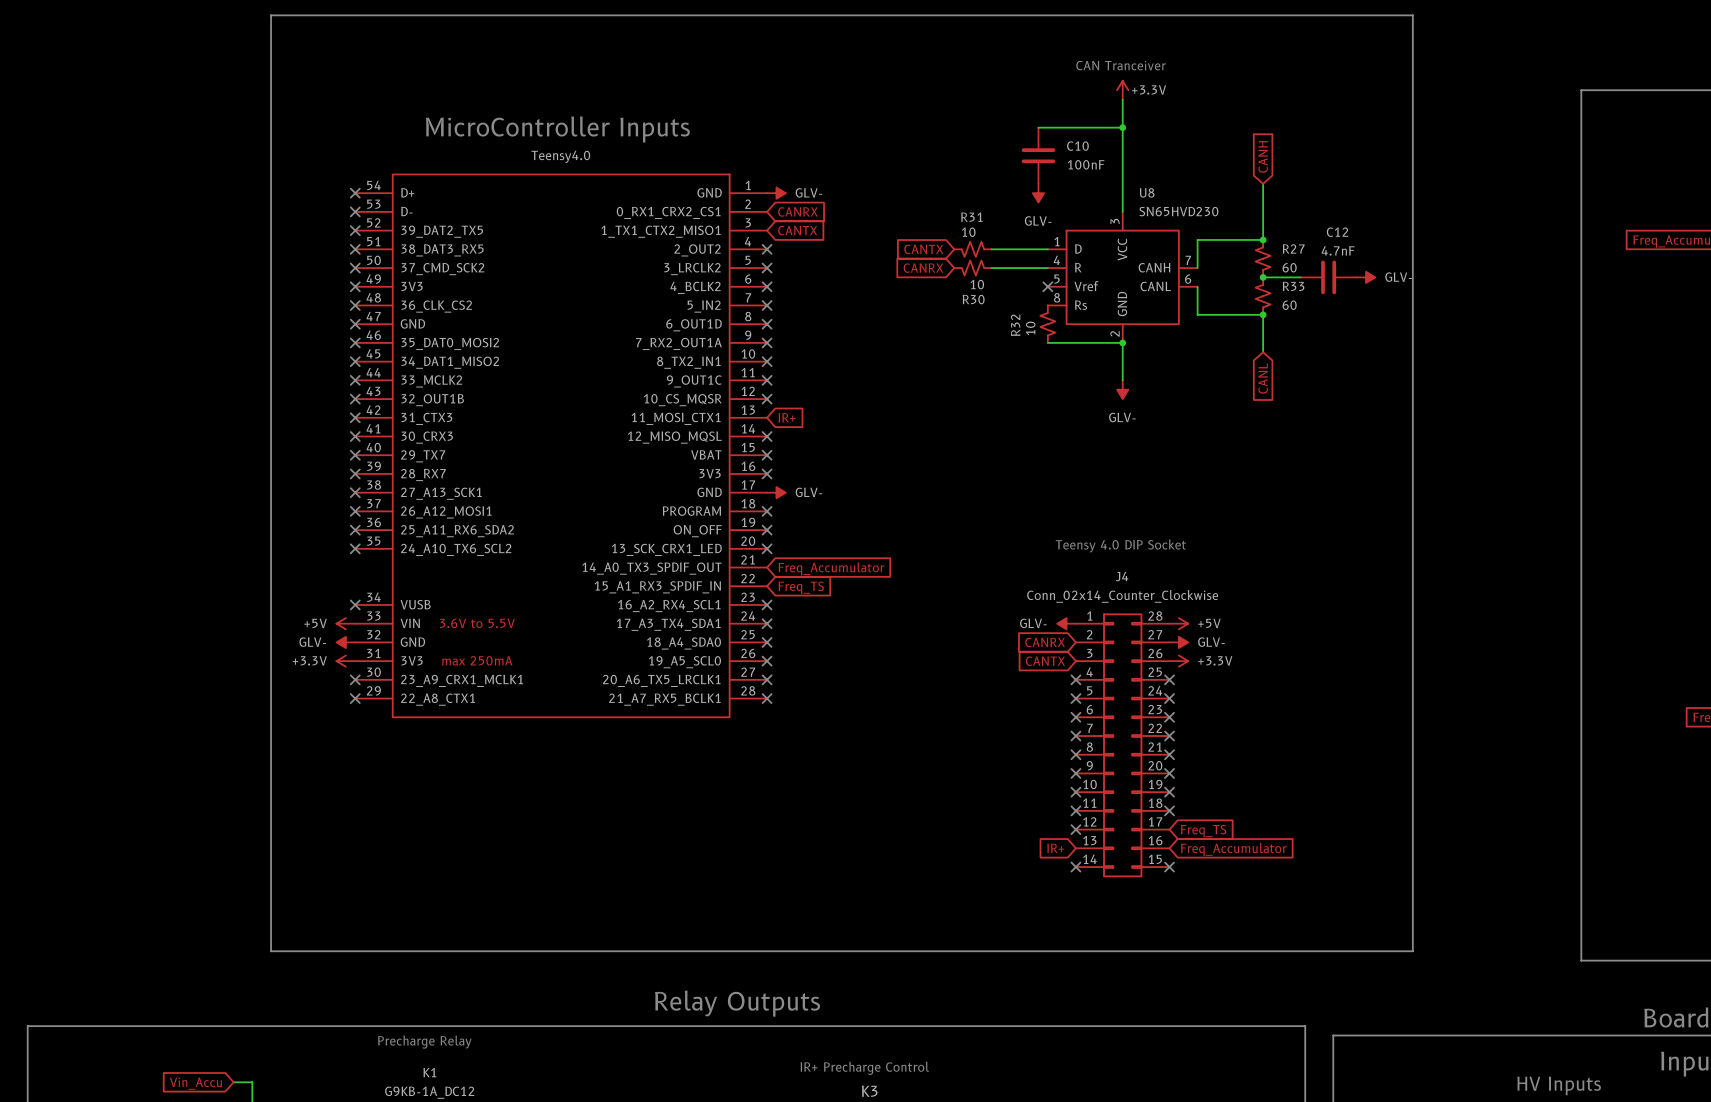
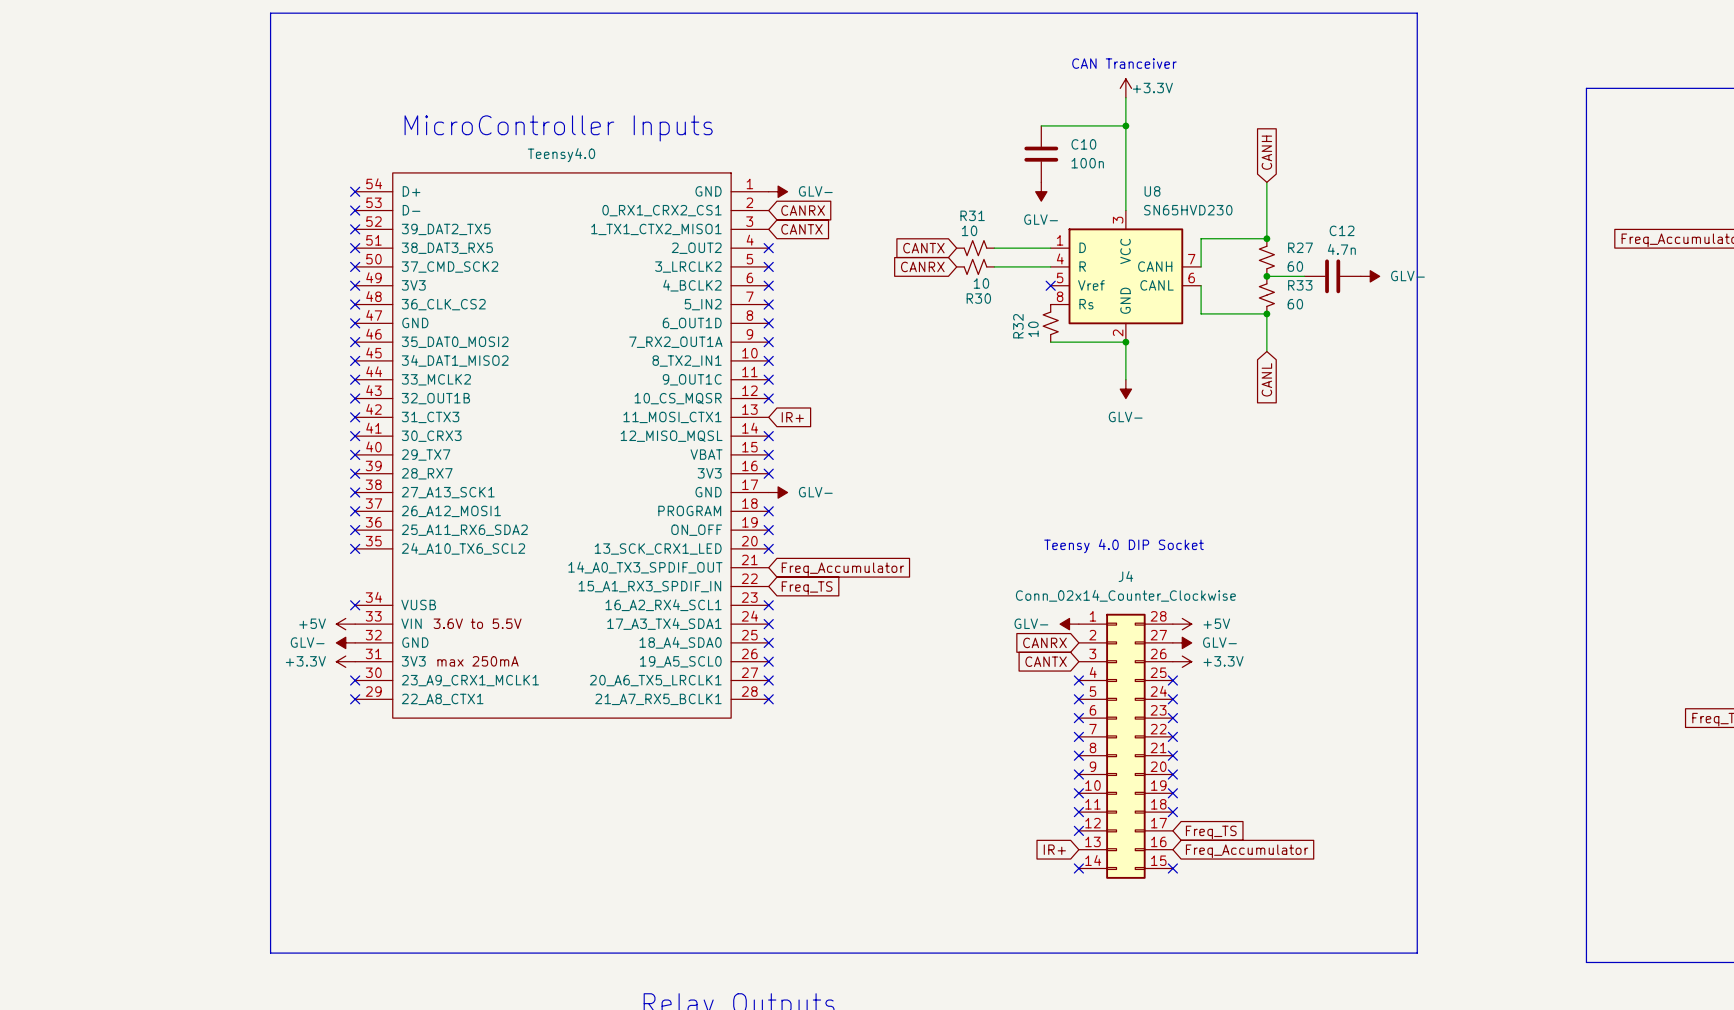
C10 value: 100nF (1086, 164) -> 100n (1087, 163)
C12 value: 4.7nF (1338, 250) -> 4.7n (1341, 249)

